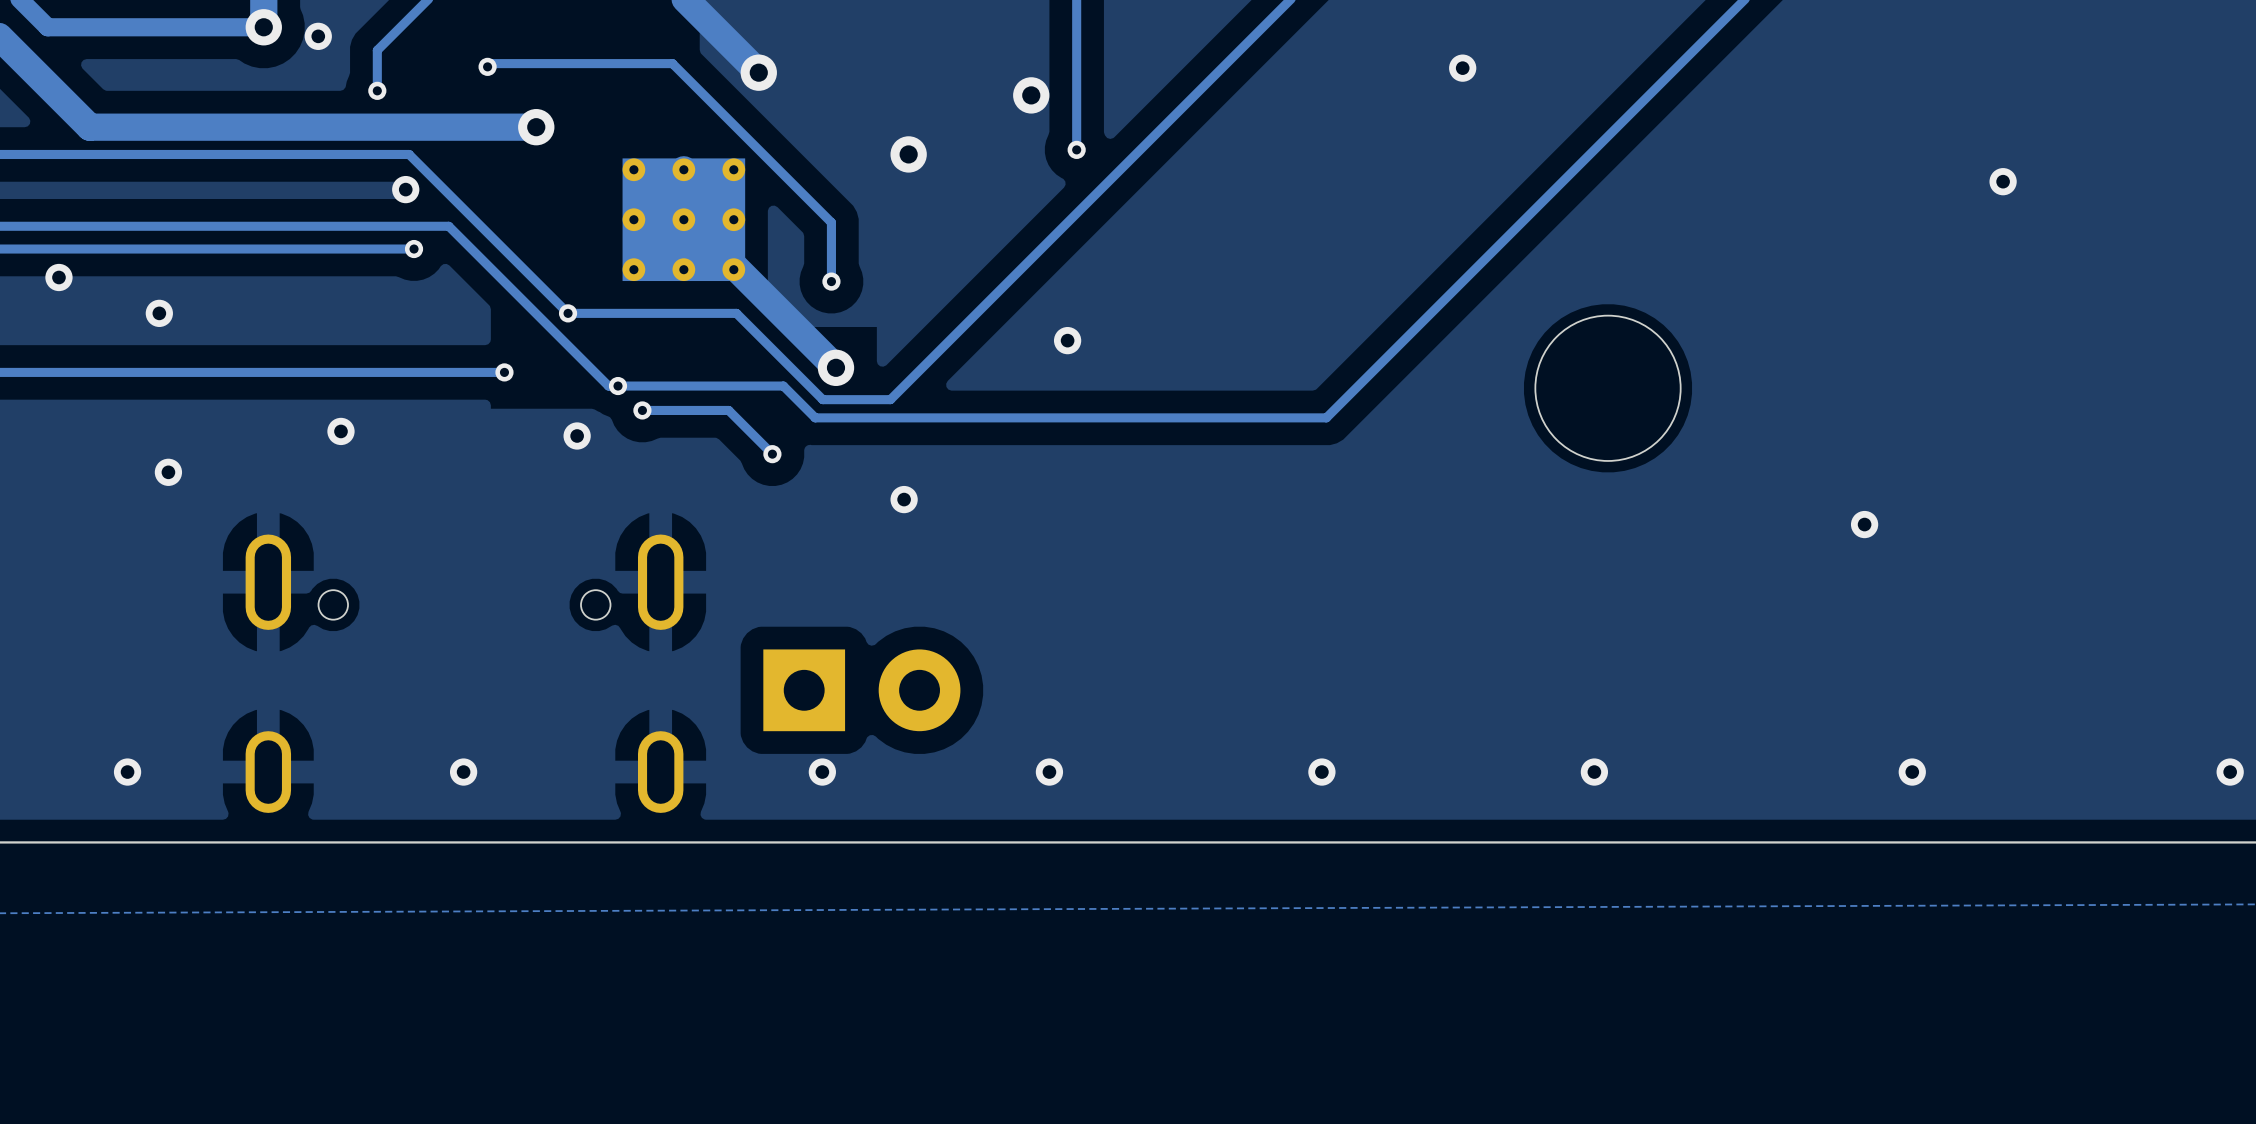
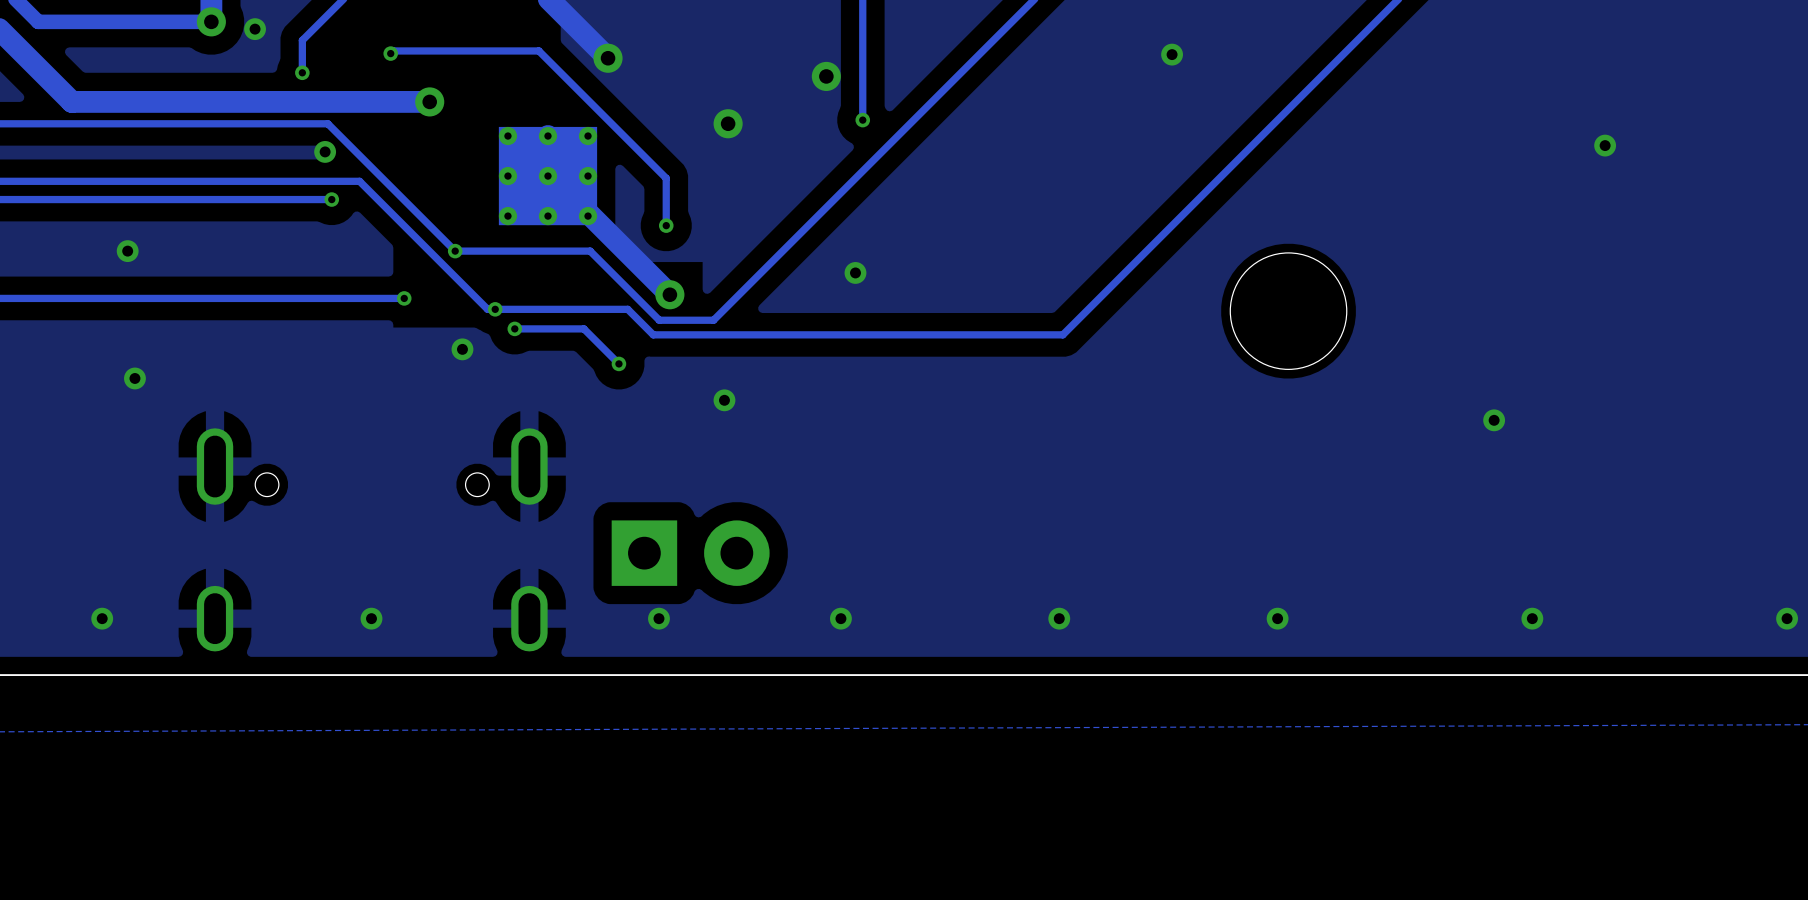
via: (58, 277) -> none
via: (340, 431) -> none

